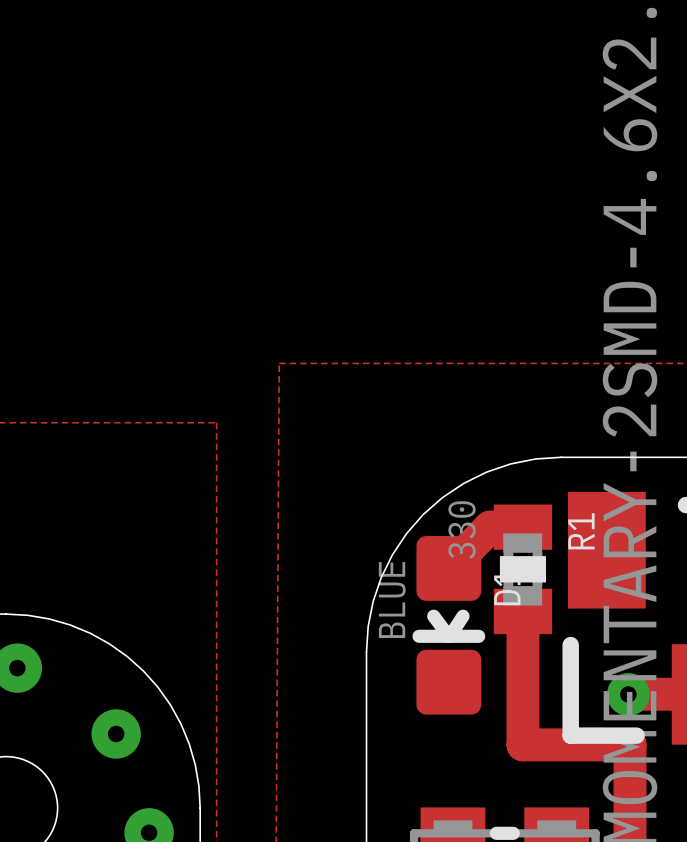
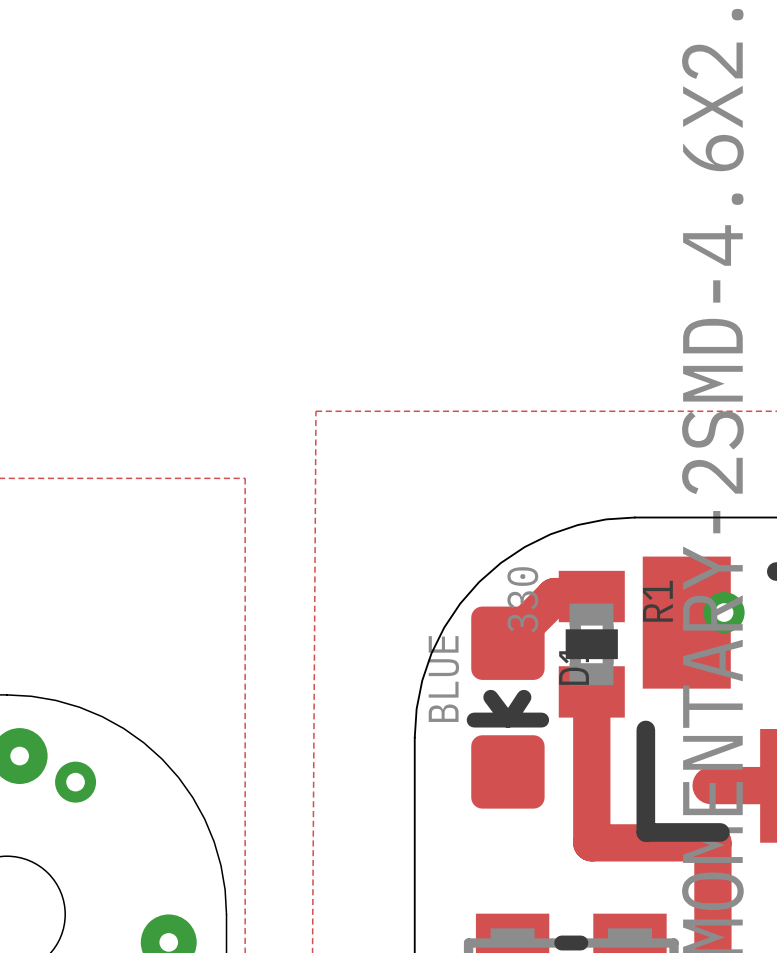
via: none -> (724, 612)
via: none -> (75, 782)
via: (628, 694) -> none
via: (116, 733) -> none

